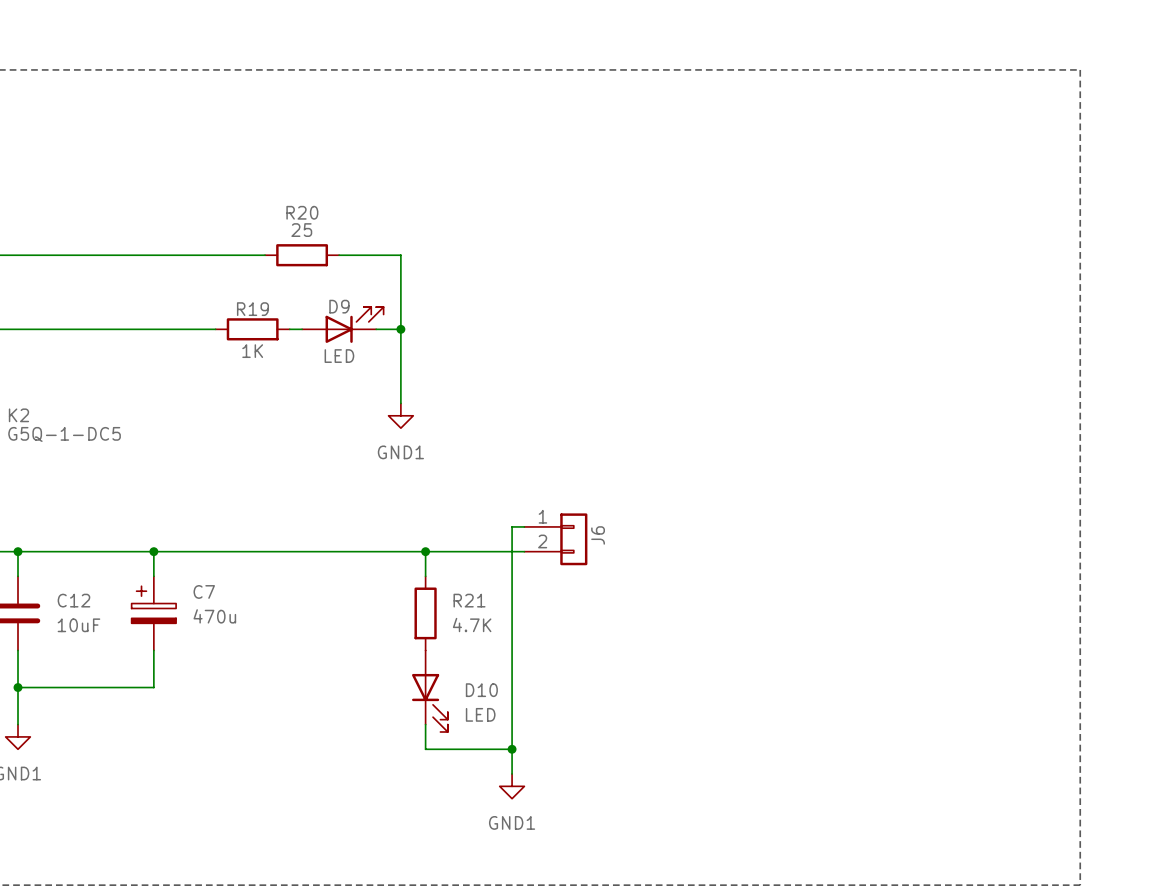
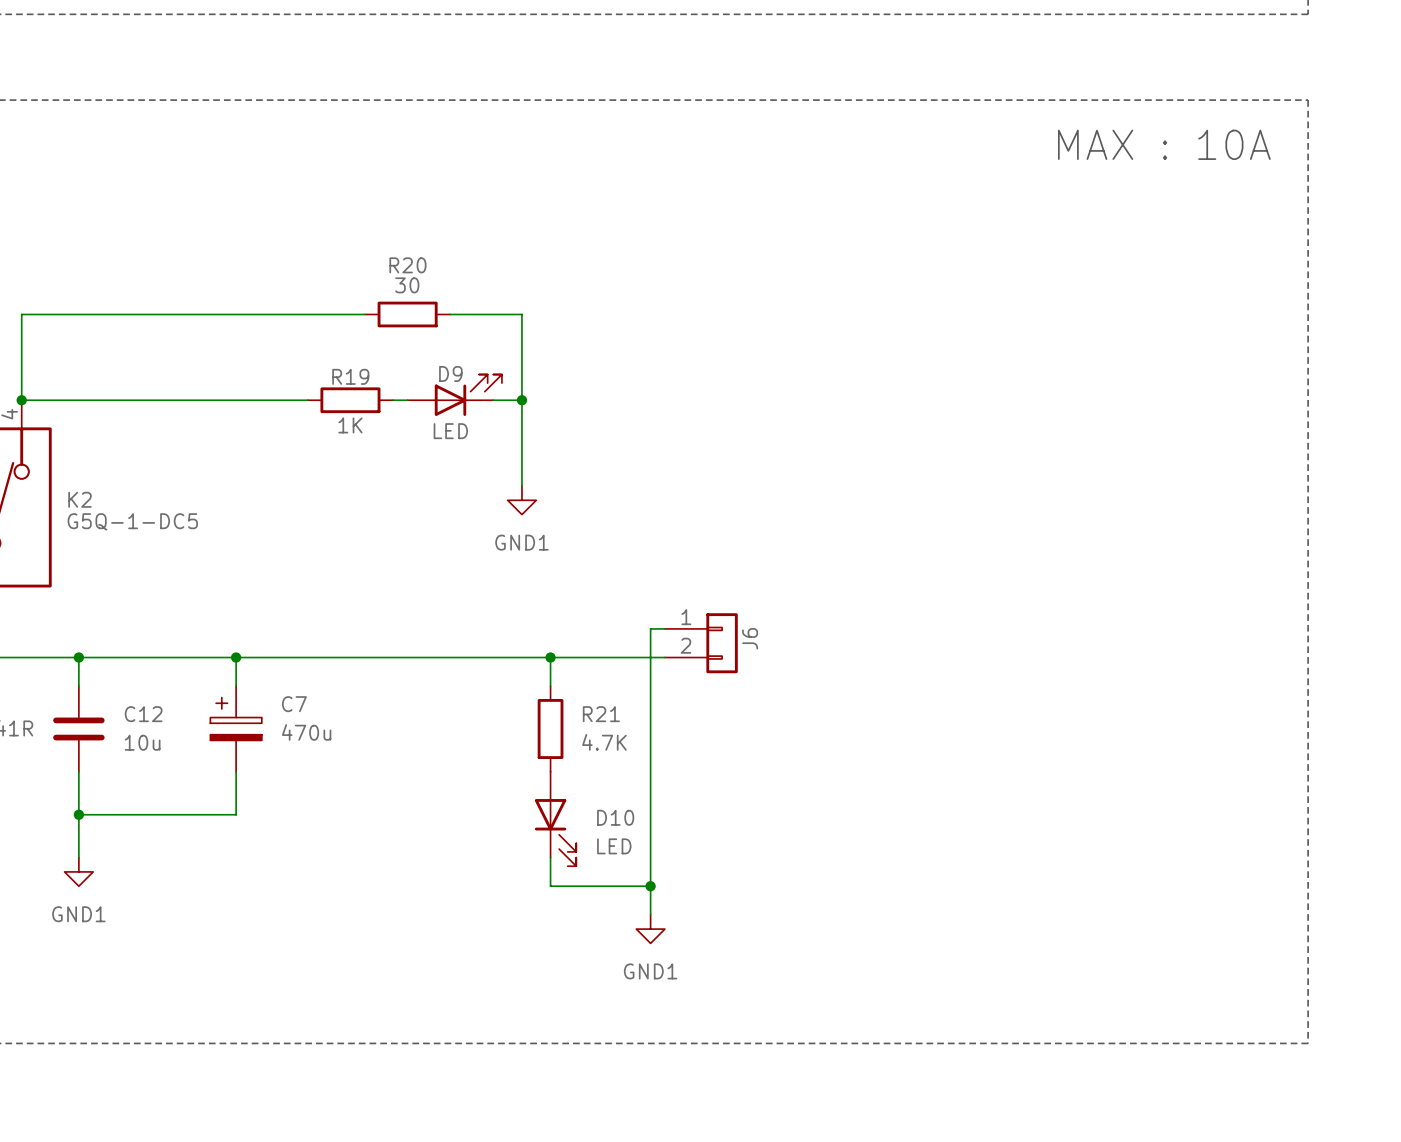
text: none -> MAX : 10A (1164, 144)
R20 value: 25 (301, 230) -> 30 (407, 285)
C12 value: 10uF (78, 625) -> 10u (142, 742)

